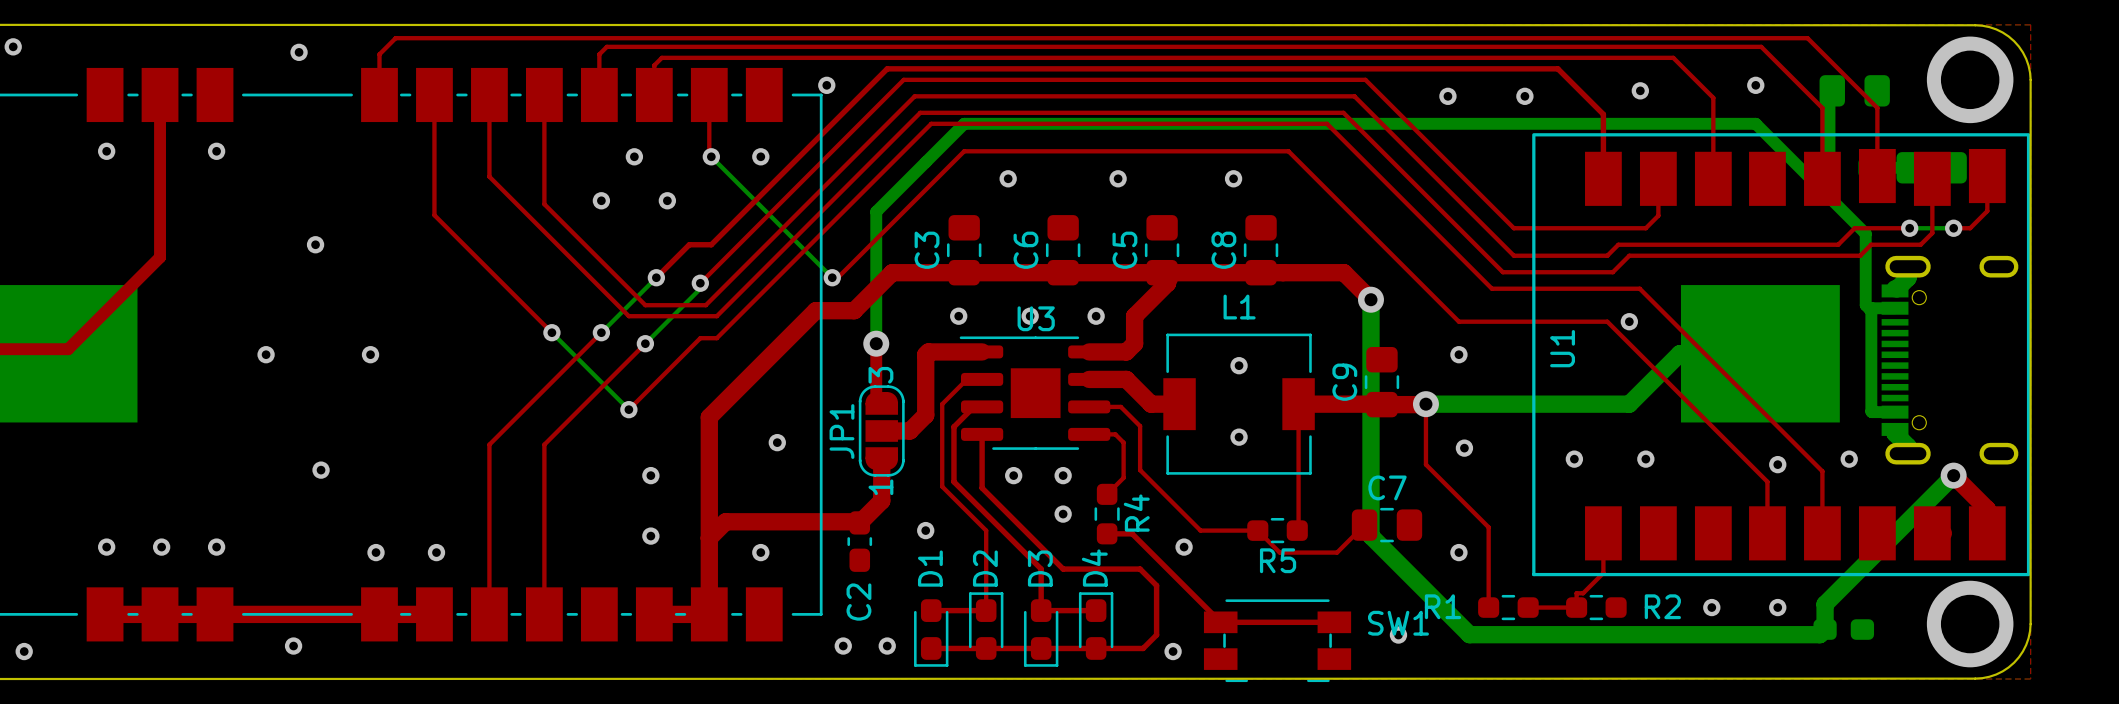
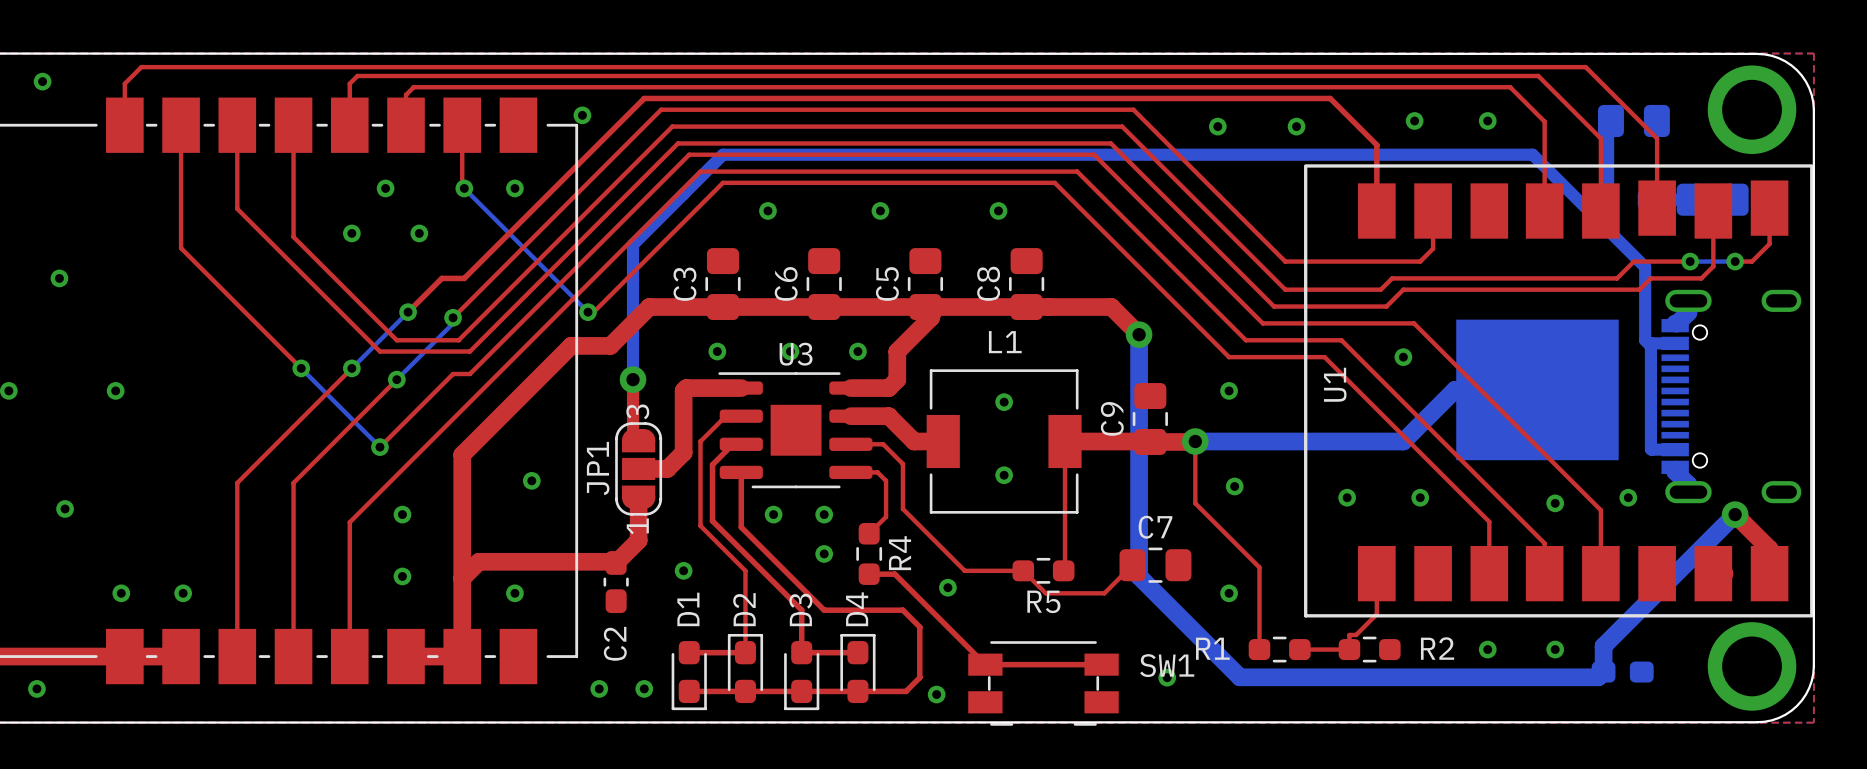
top track: (1673, 57) (1713, 97) (1713, 178) -> (1448, 87) (1510, 87) (1544, 121) (1544, 211)
via position: (1755, 85) -> (1487, 120)
top track: (1552, 321) (1607, 321) (1767, 481) (1767, 503) -> (1324, 357) (1489, 521) (1489, 573)
top track: none -> (1544, 543) (1341, 340) (1245, 340) (1077, 171) (700, 171) (349, 522) (349, 656)

